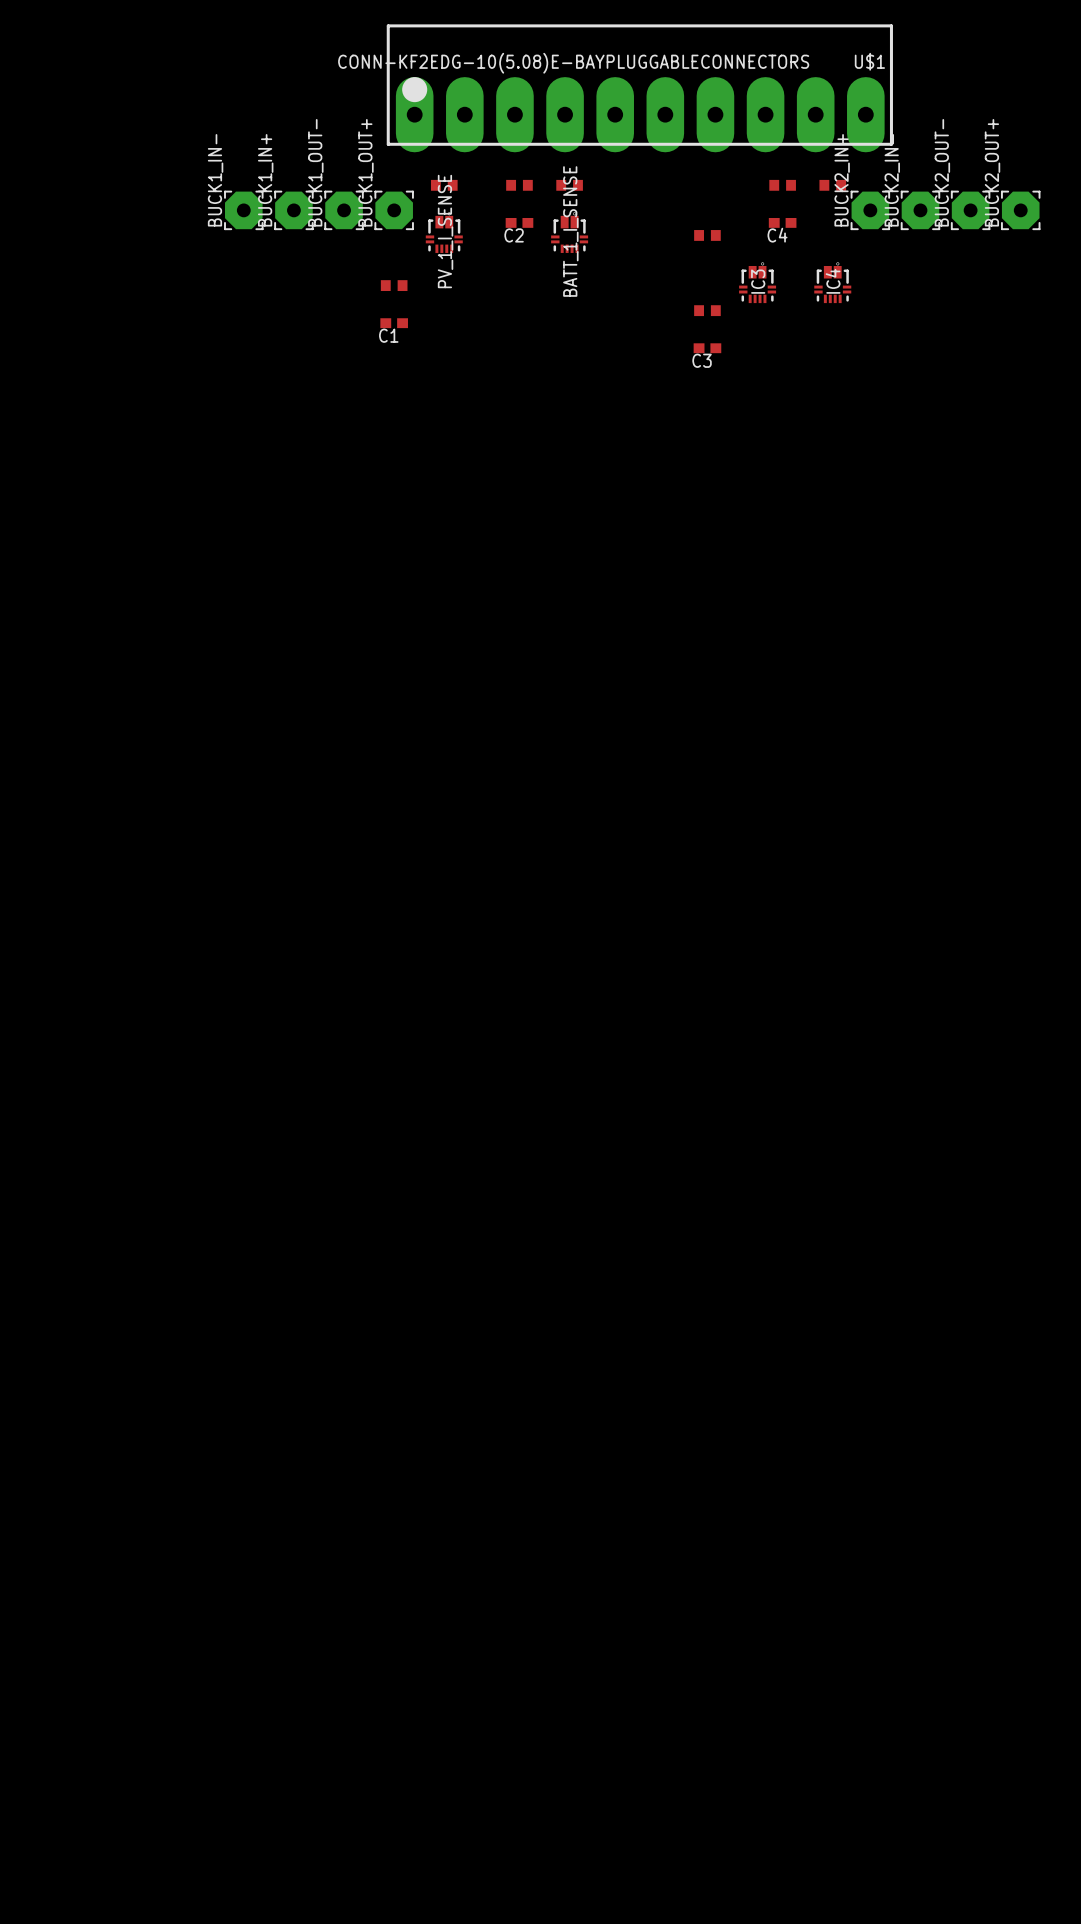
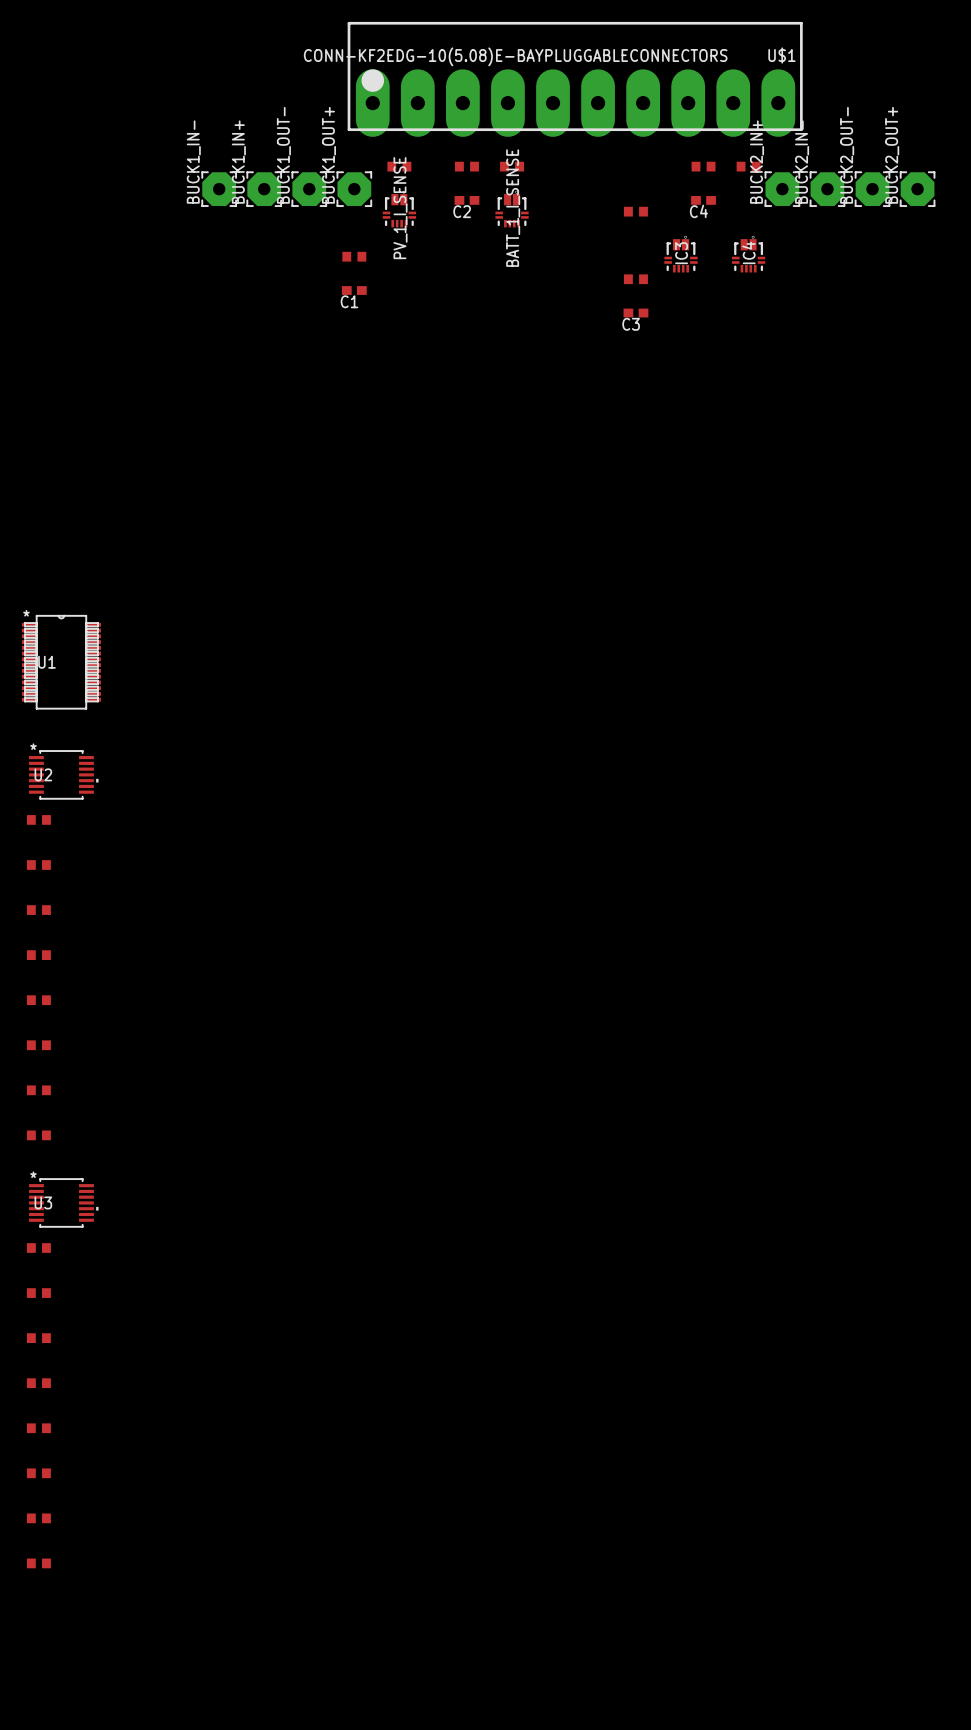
U1: none -> (61, 662)
U2: none -> (63, 774)
part: none -> (38, 819)
part: none -> (38, 865)
part: none -> (38, 910)
part: none -> (38, 955)
part: none -> (38, 1000)
part: none -> (38, 1045)
part: none -> (38, 1090)
part: none -> (38, 1135)
U3: none -> (63, 1202)
part: none -> (38, 1248)
part: none -> (38, 1293)
part: none -> (38, 1338)
part: none -> (38, 1383)
part: none -> (38, 1428)
part: none -> (38, 1473)
part: none -> (38, 1518)
part: none -> (38, 1563)

